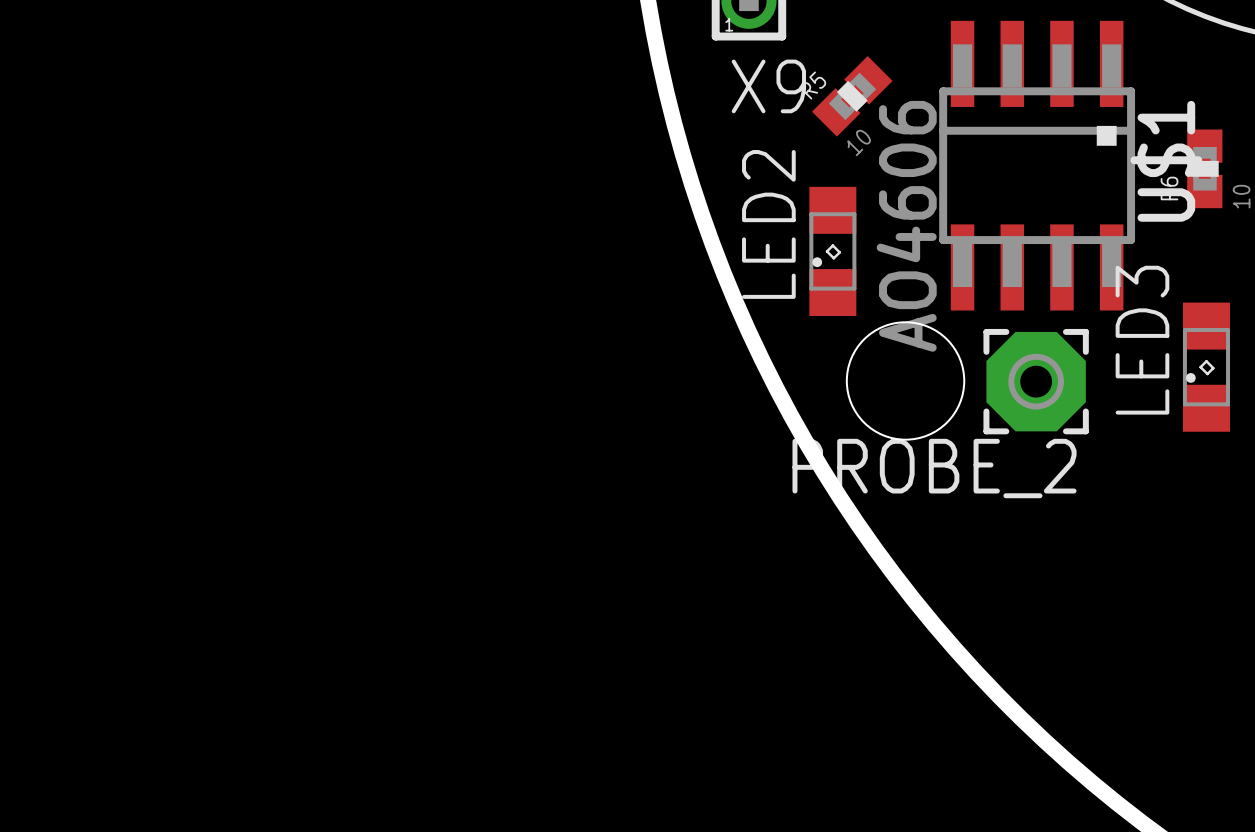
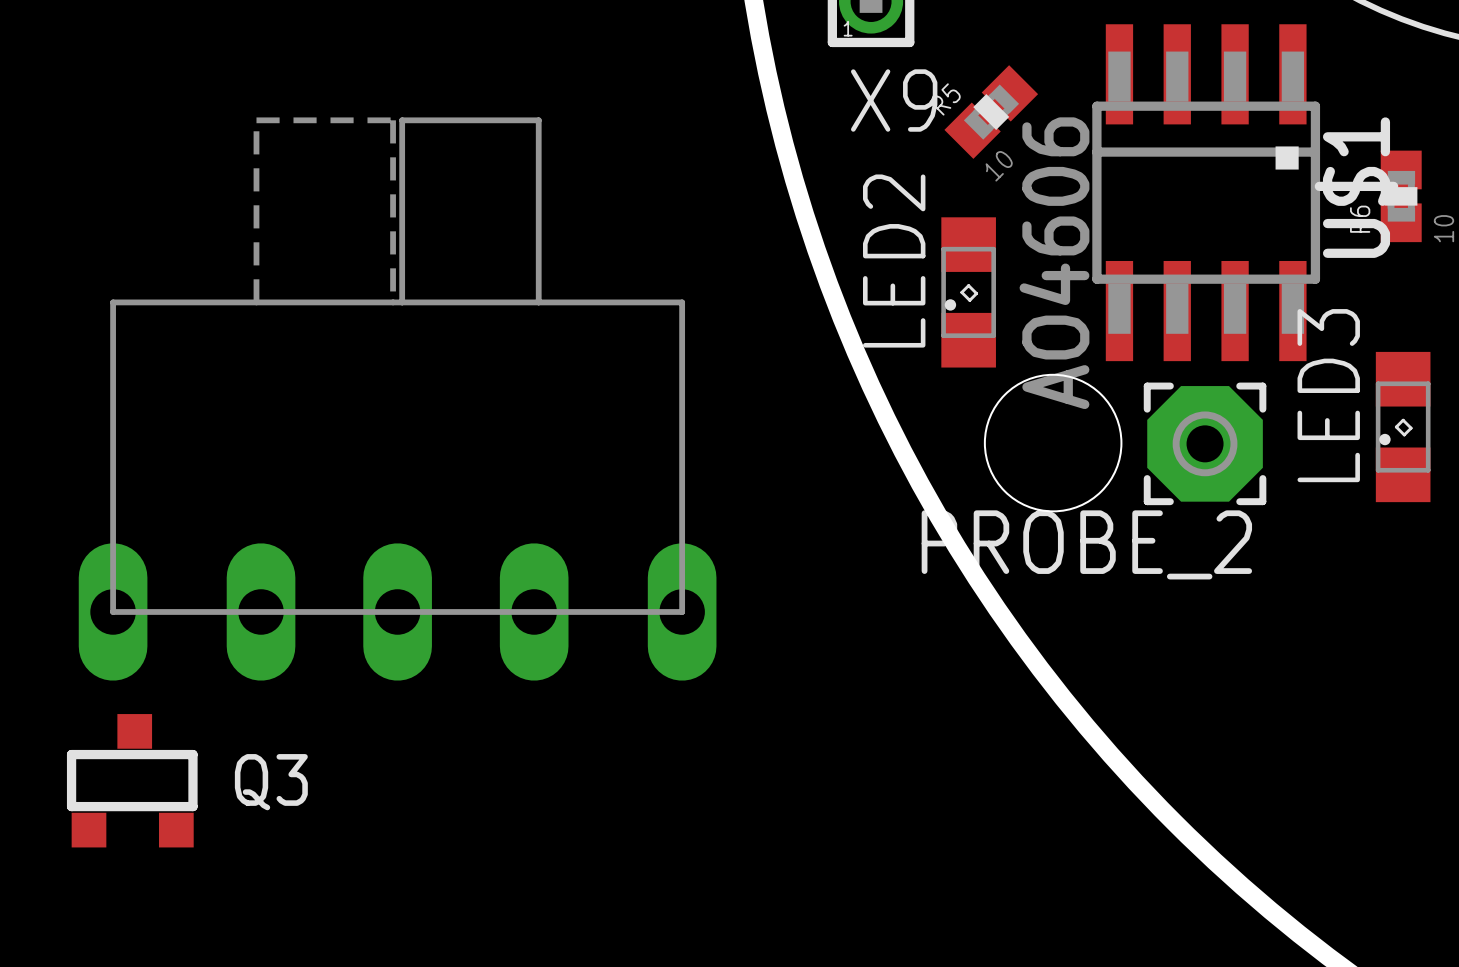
part: none -> (397, 399)
Q3: none -> (132, 780)

